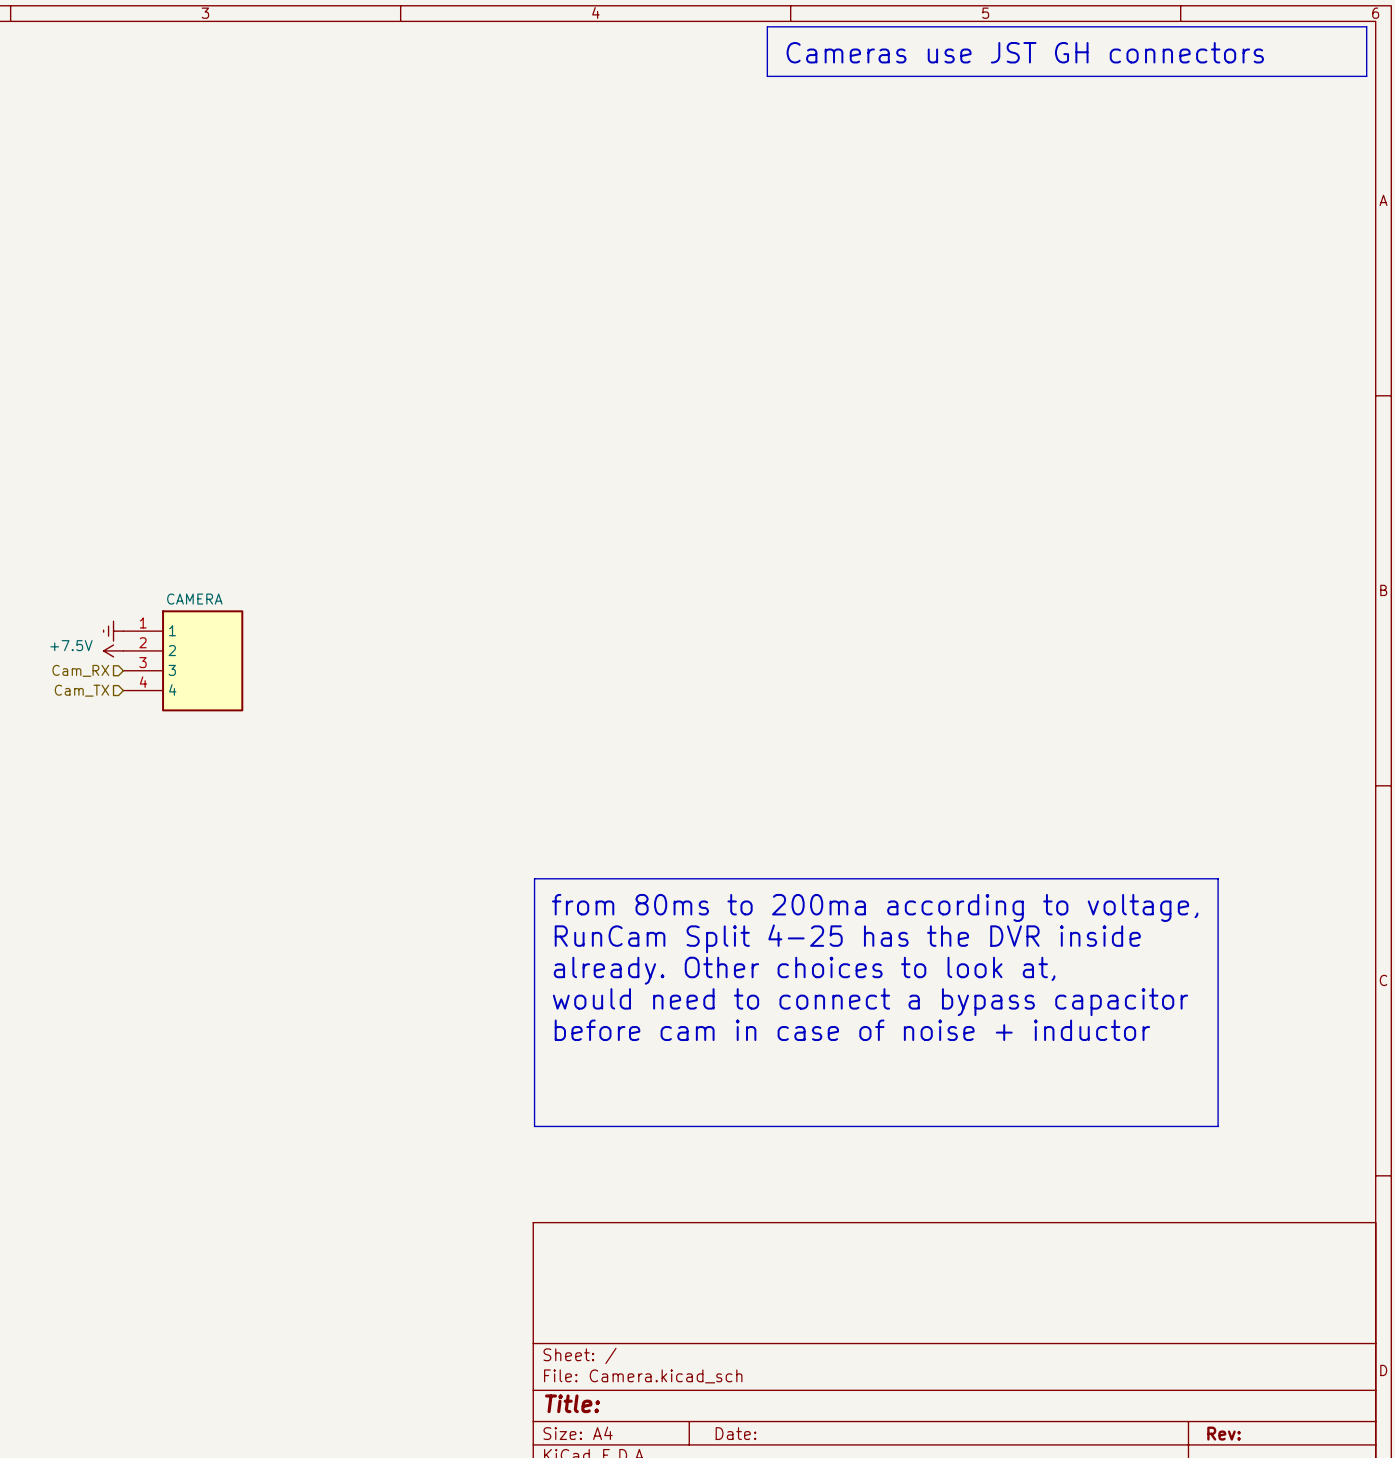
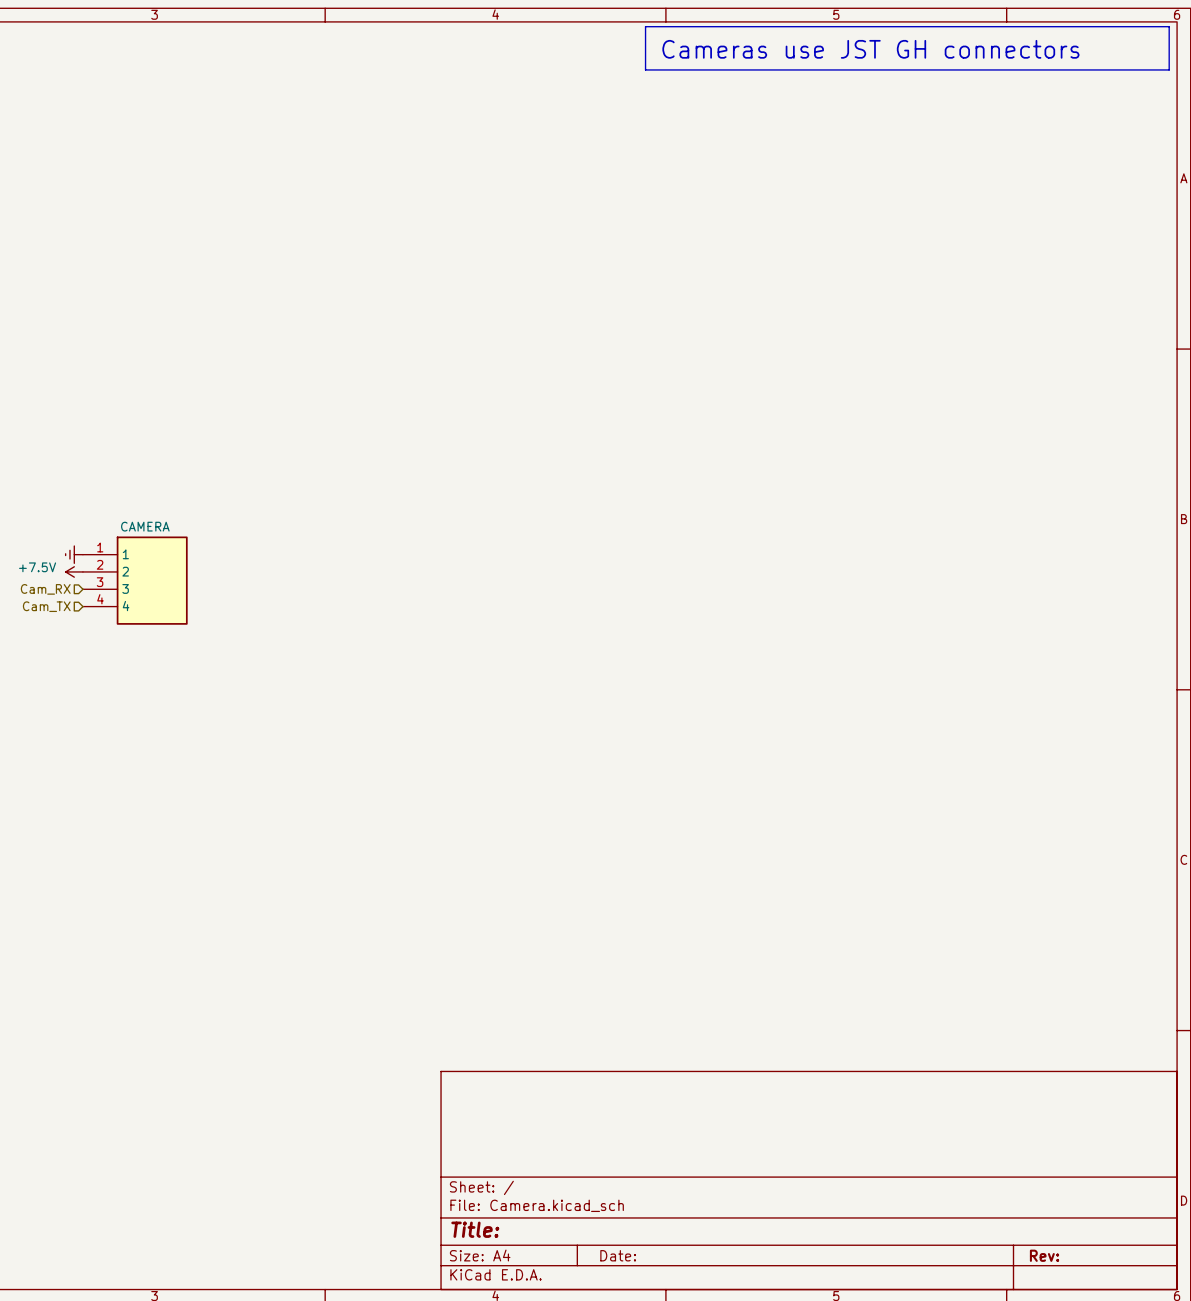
line: (534, 878) (1218, 878) (1218, 1126) (534, 1126) (534, 878) -> none
text: from 80ms to 200ma according to voltage, (875, 907) -> none
text: RunCam Split 4-25 has the DVR inside (847, 938) -> none
text: already. Other choices to look at, (804, 970) -> none
text: would need to connect a bypass capacitor (870, 1002) -> none
text: before cam in case of noise + inductor (852, 1030) -> none

